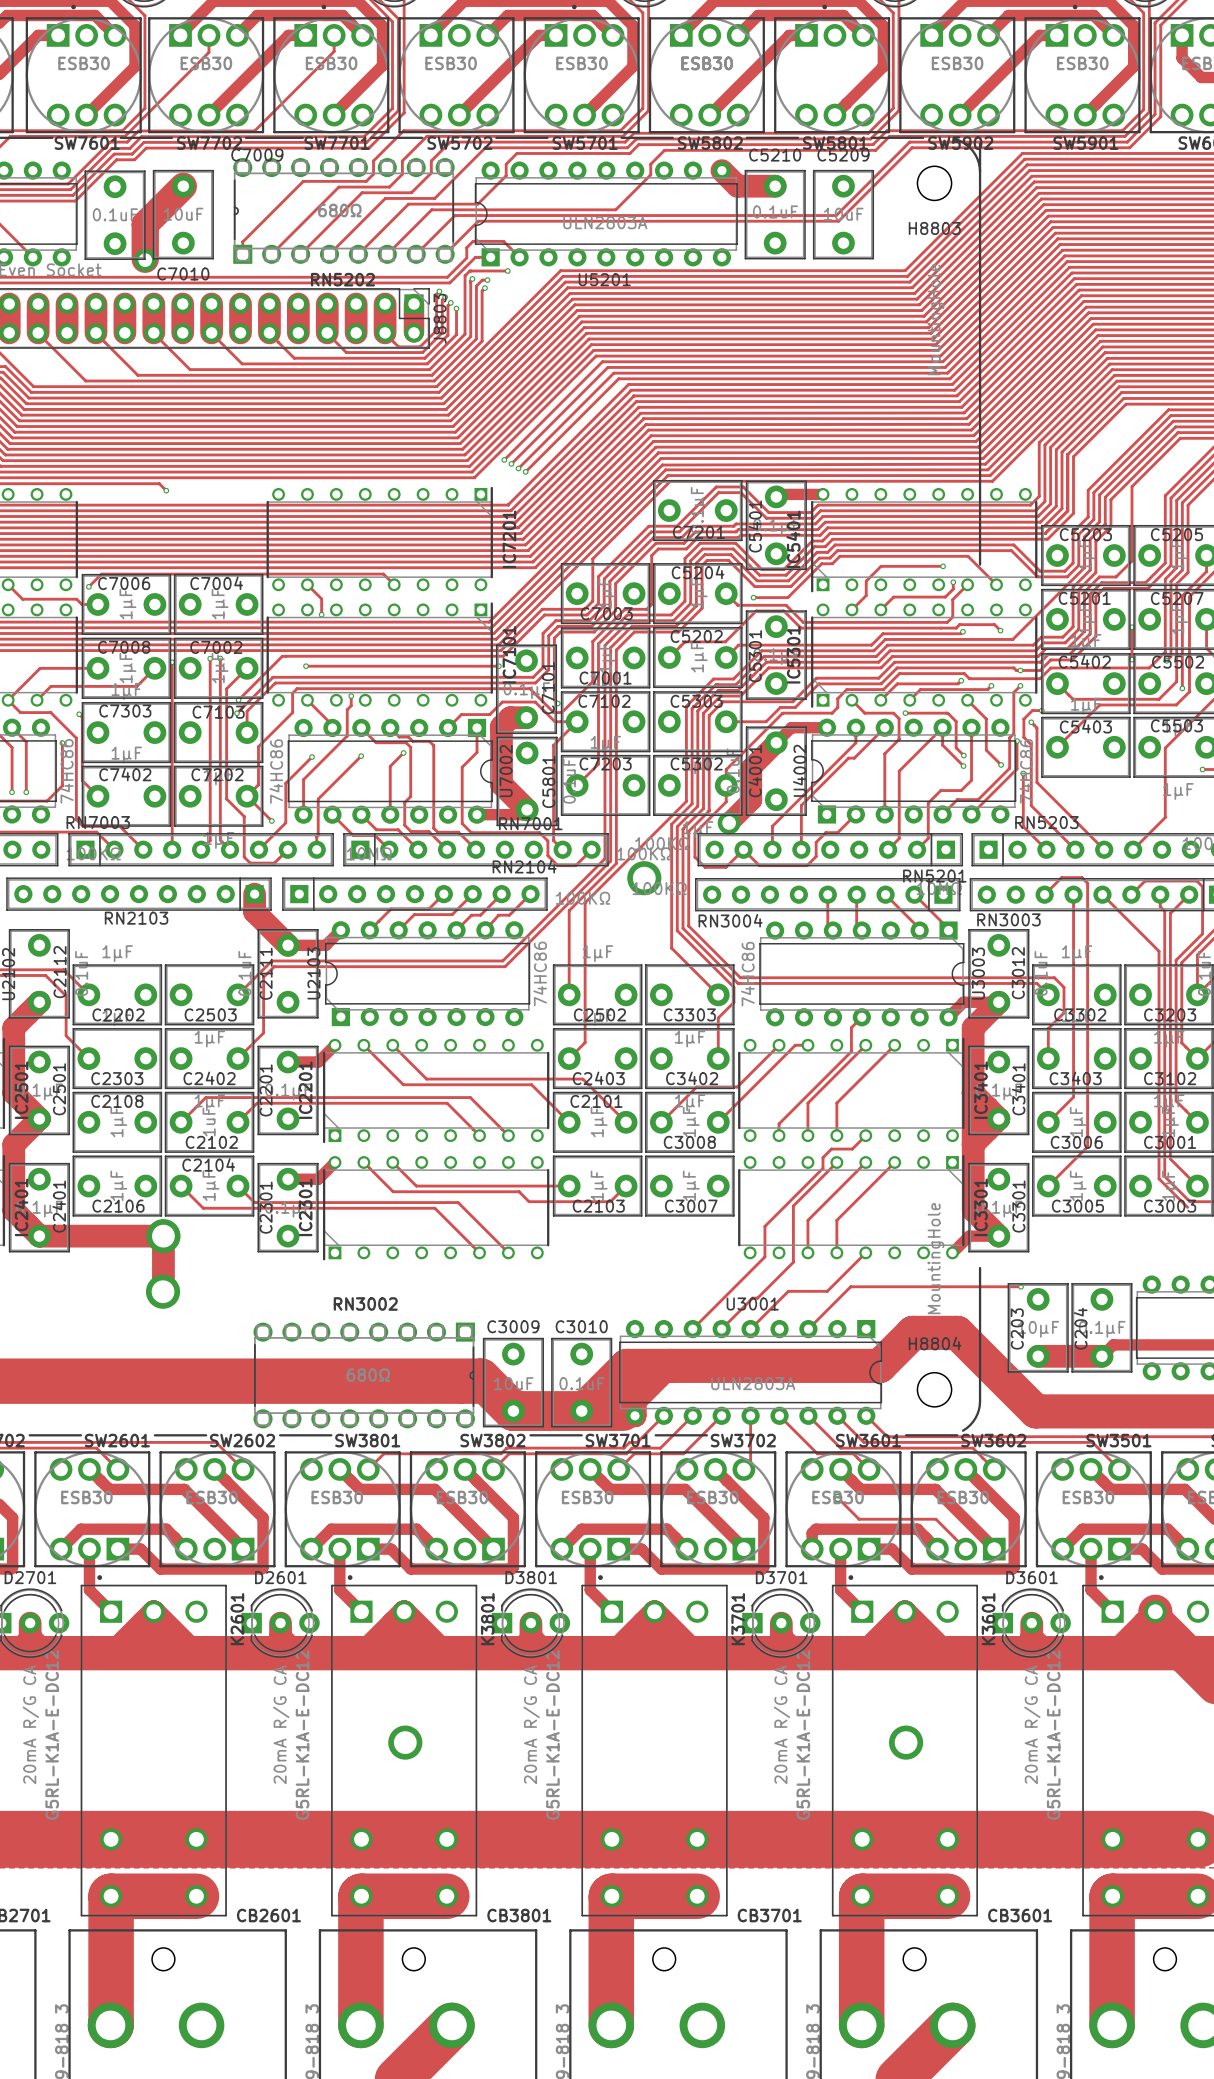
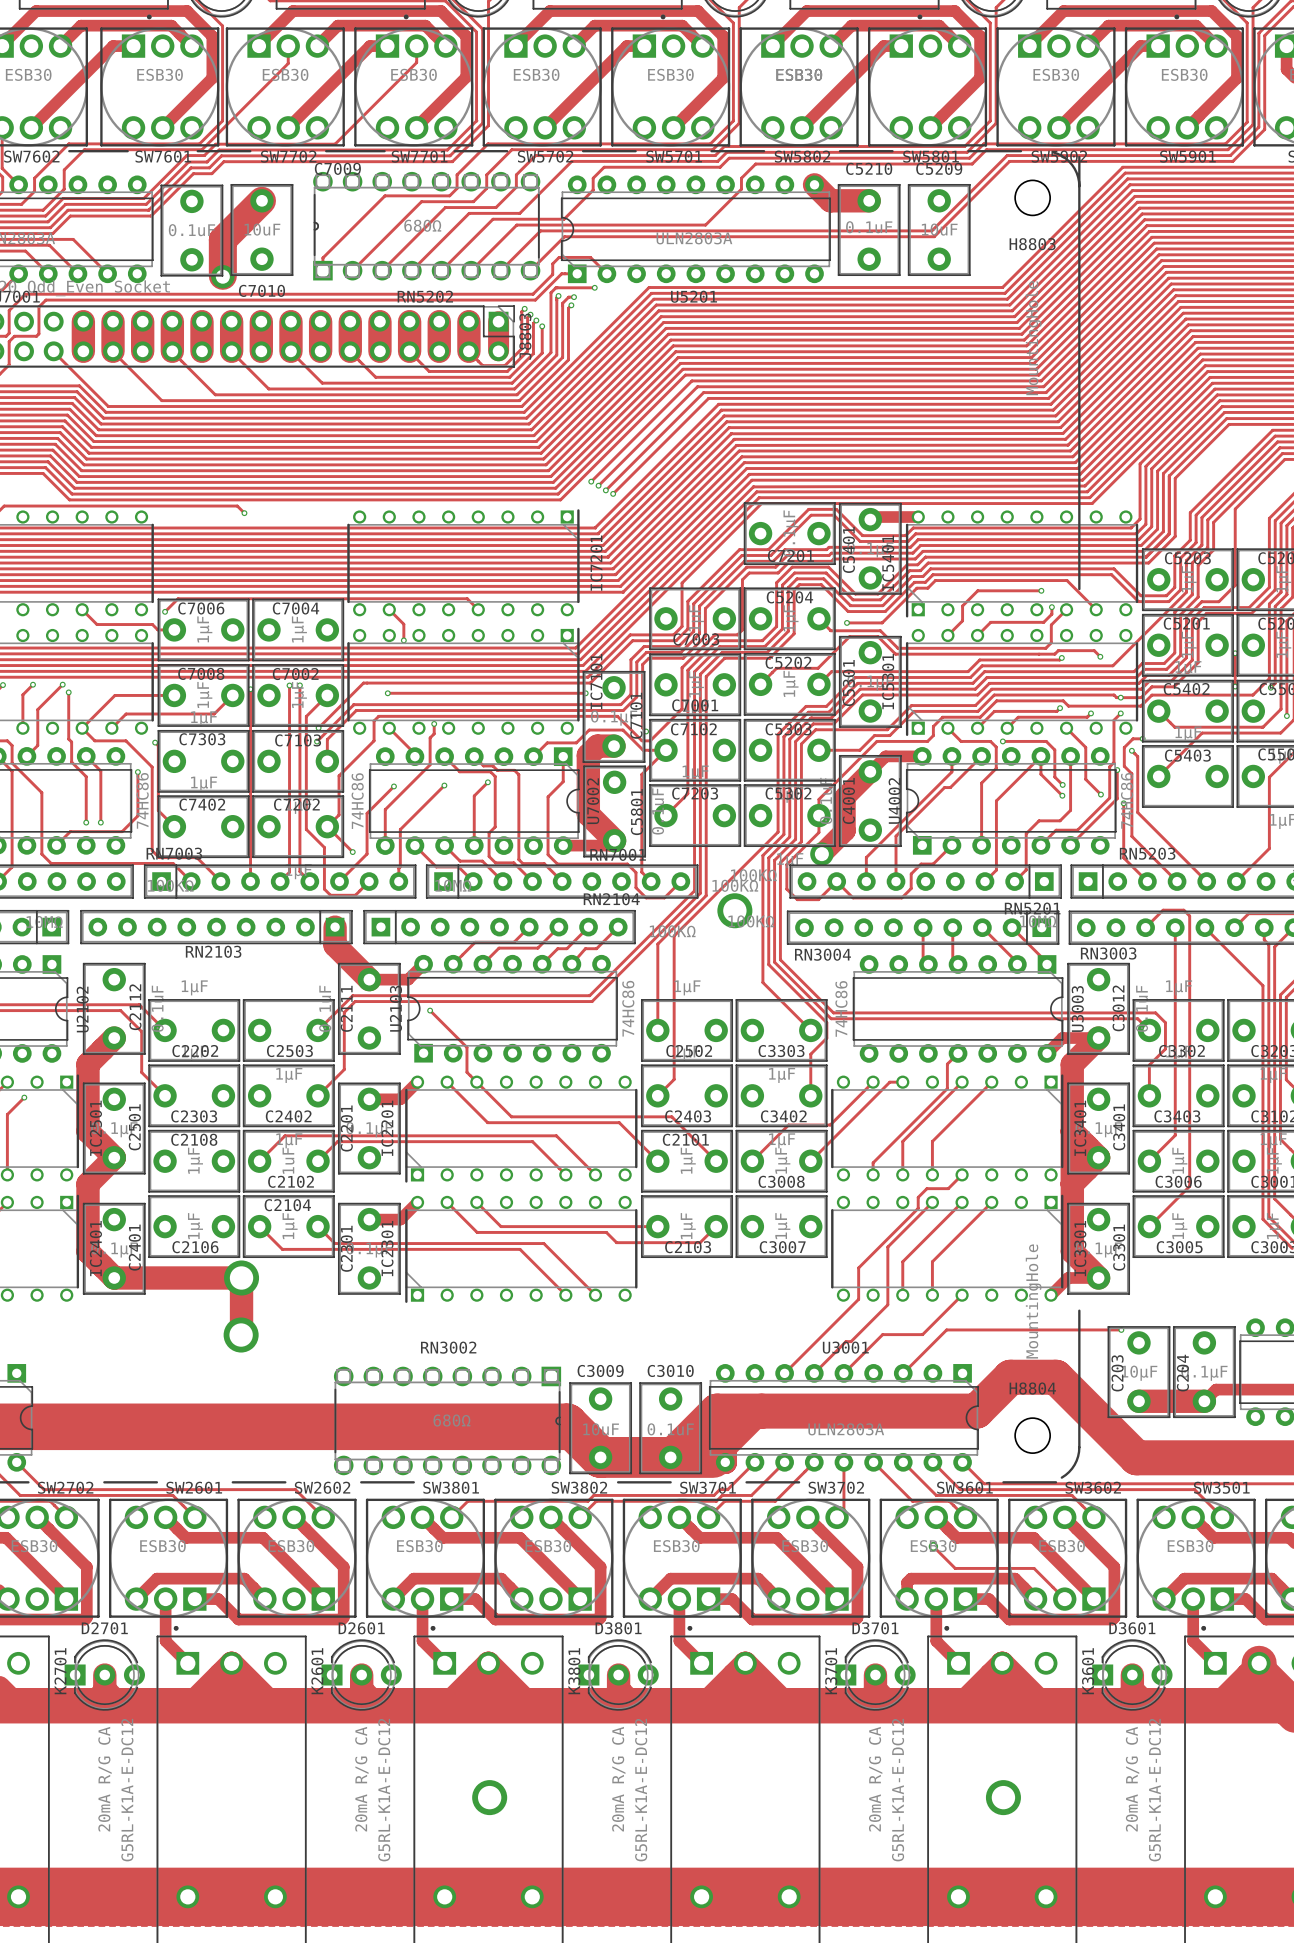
track: none -> (430, 1010) (466, 1047) (466, 1072) (476, 1082)
via: none -> (430, 1010)

